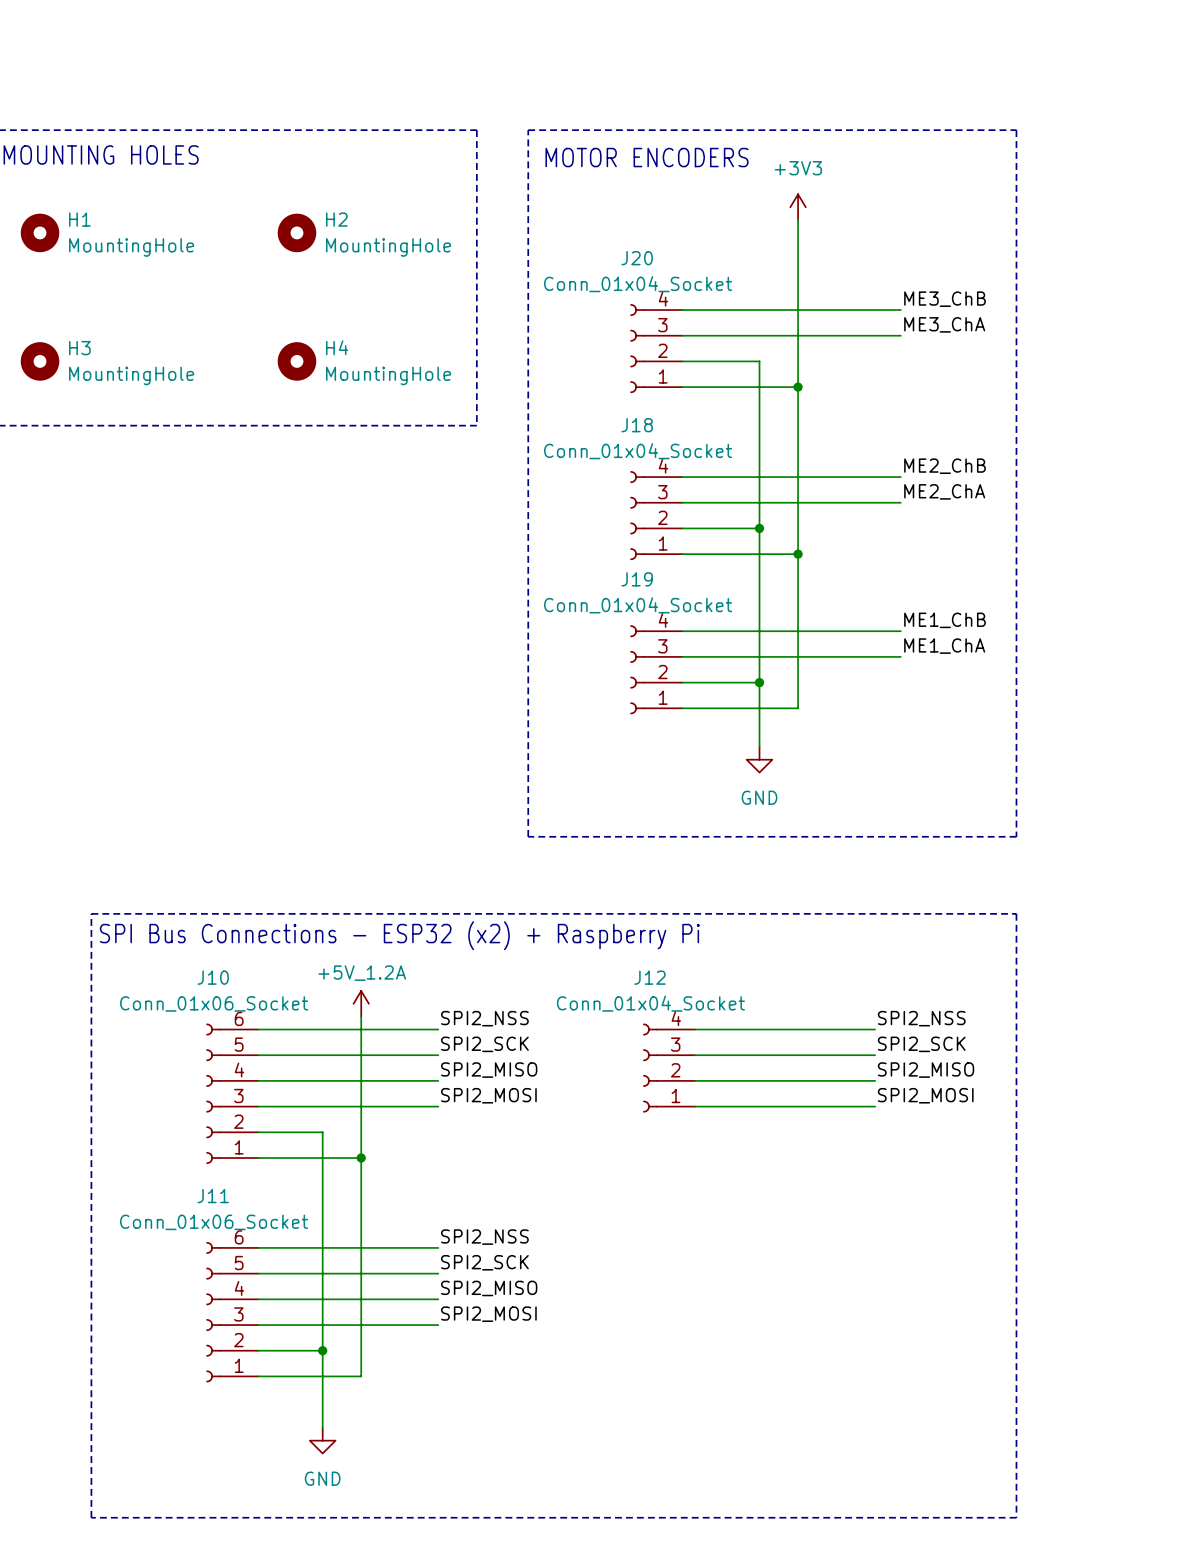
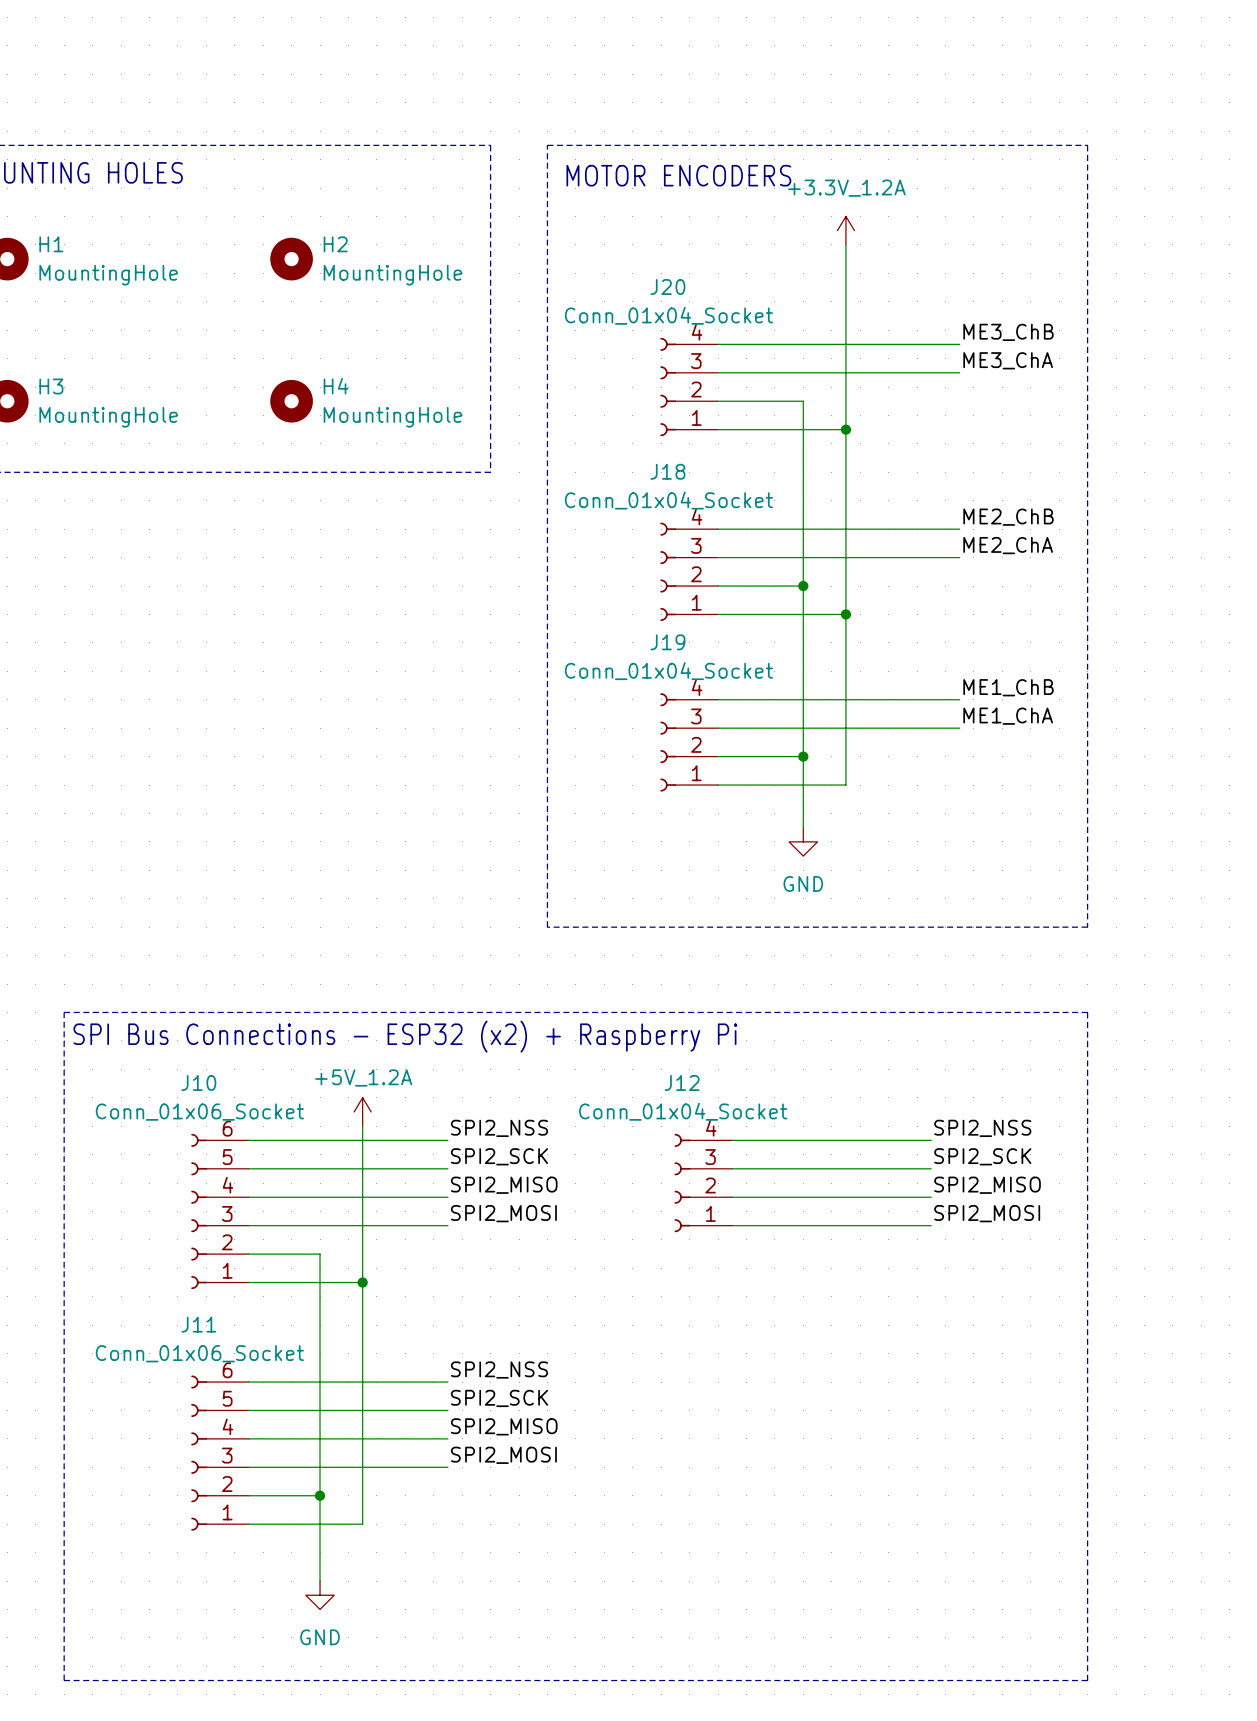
power symbol: +3V3 (798, 207) -> +3.3V_1.2A (845, 230)

